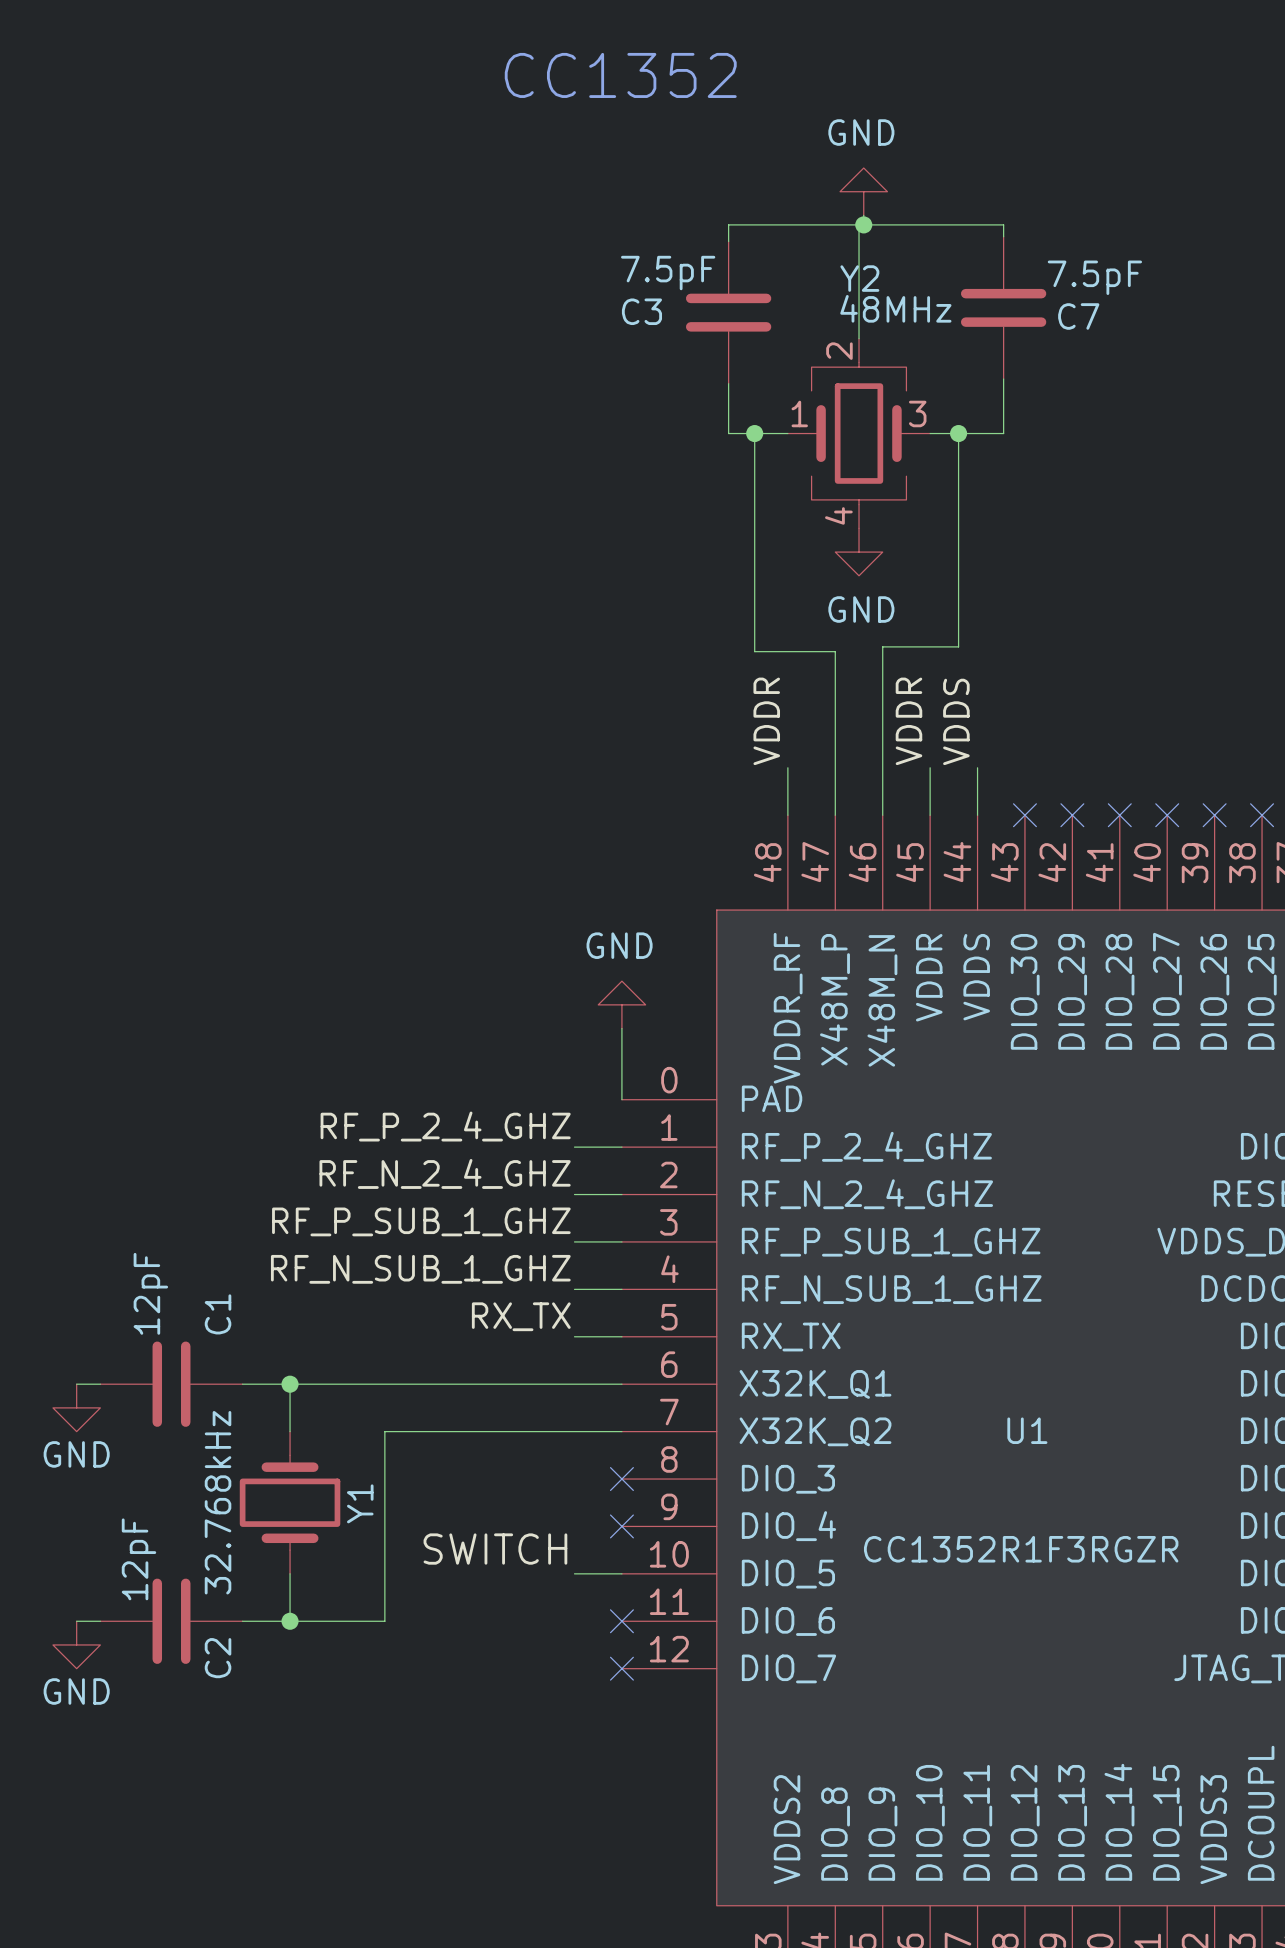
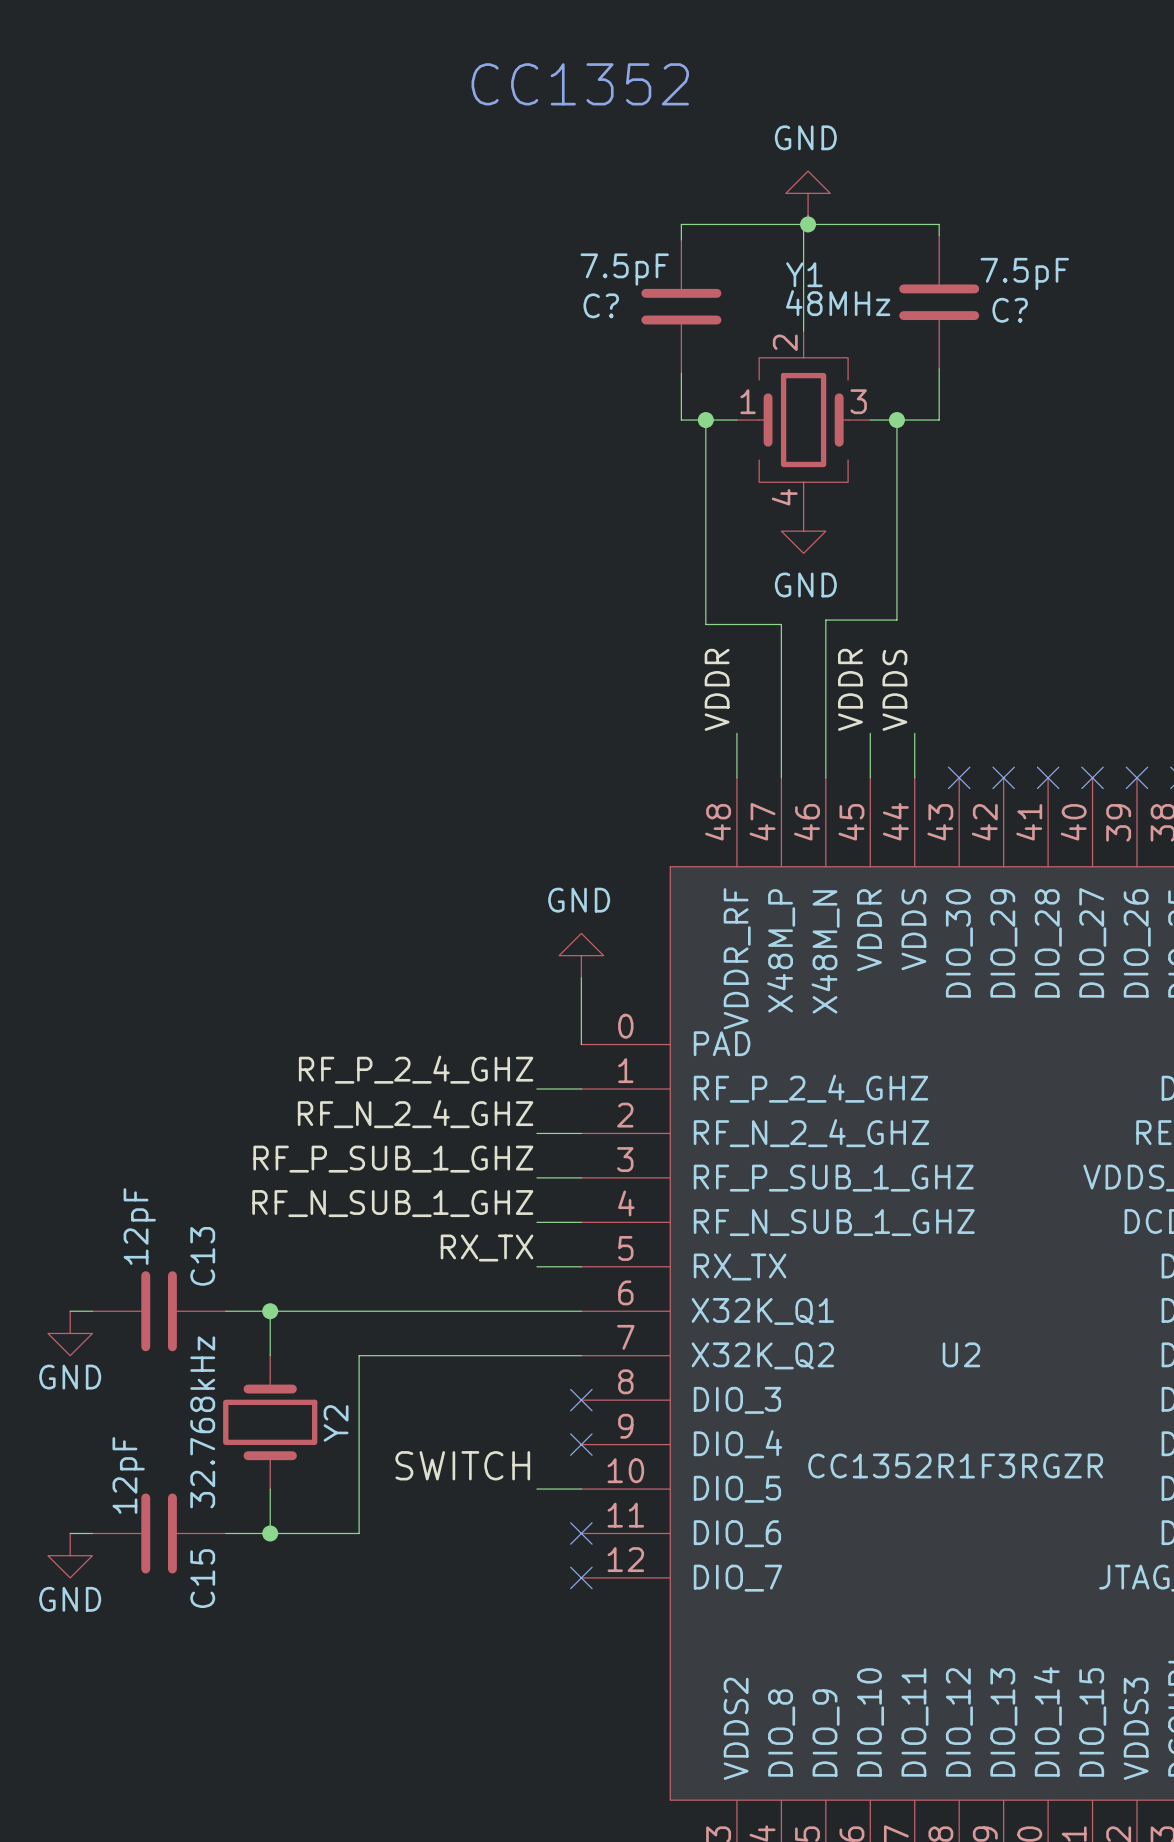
Y2 name: Y2 (859, 278) -> Y1 (804, 274)
C3 name: C3 (641, 311) -> C? (601, 305)
C7 name: C7 (1078, 316) -> C? (1010, 310)
C1 name: C1 (218, 1314) -> C13 (202, 1256)
U1 name: U1 (1027, 1430) -> U2 (961, 1354)
Y1 name: Y1 (360, 1503) -> Y2 (336, 1423)
C2 name: C2 (218, 1658) -> C15 (202, 1578)

